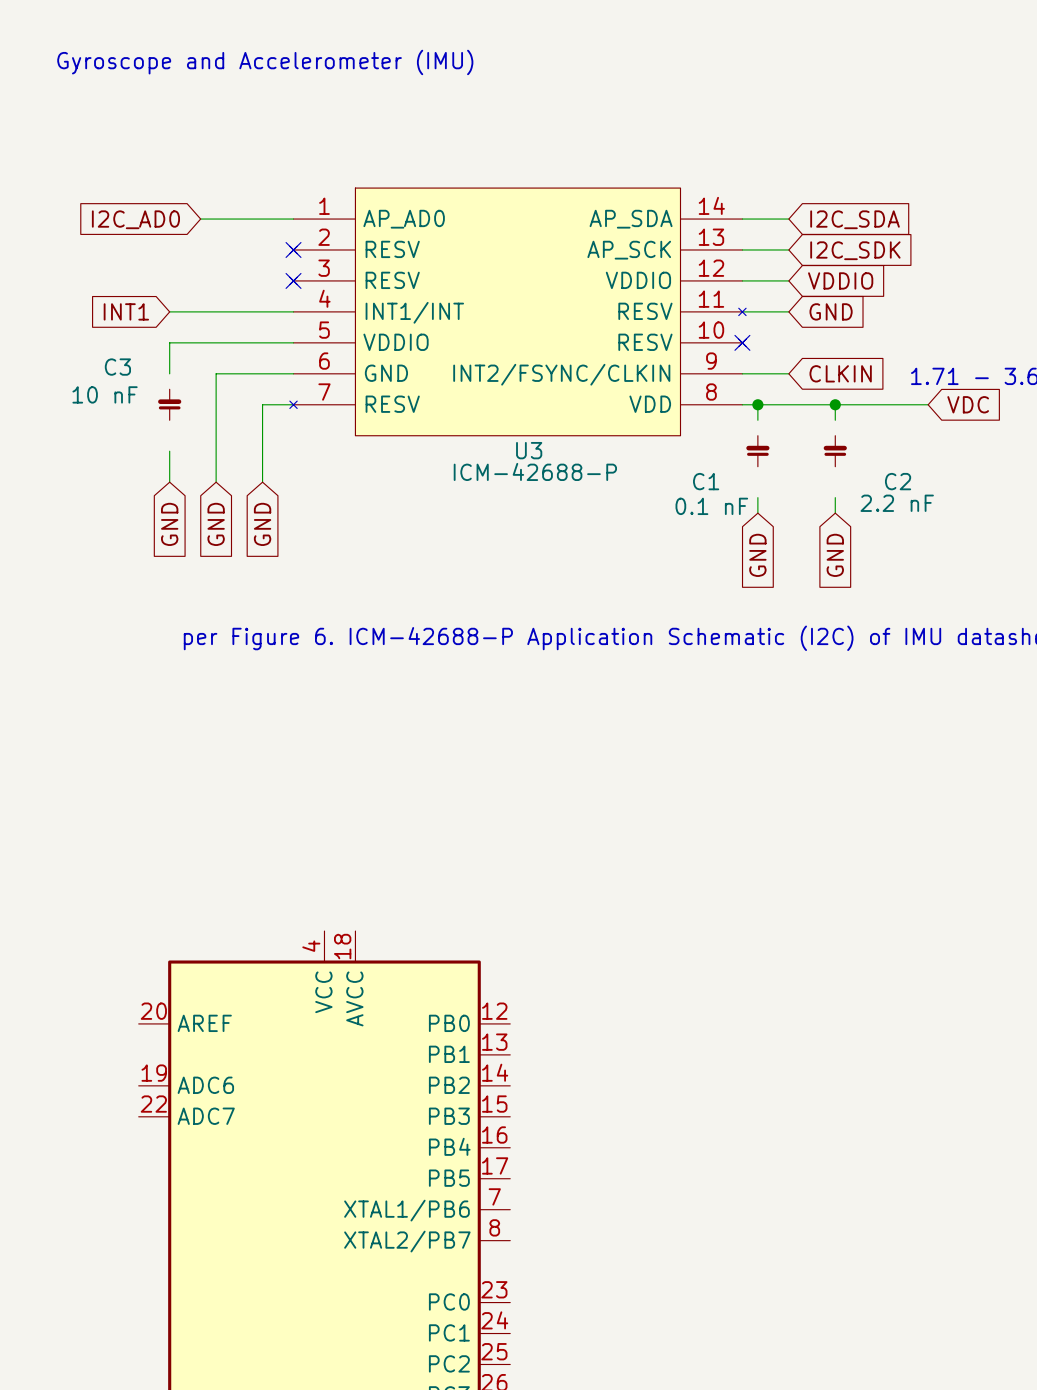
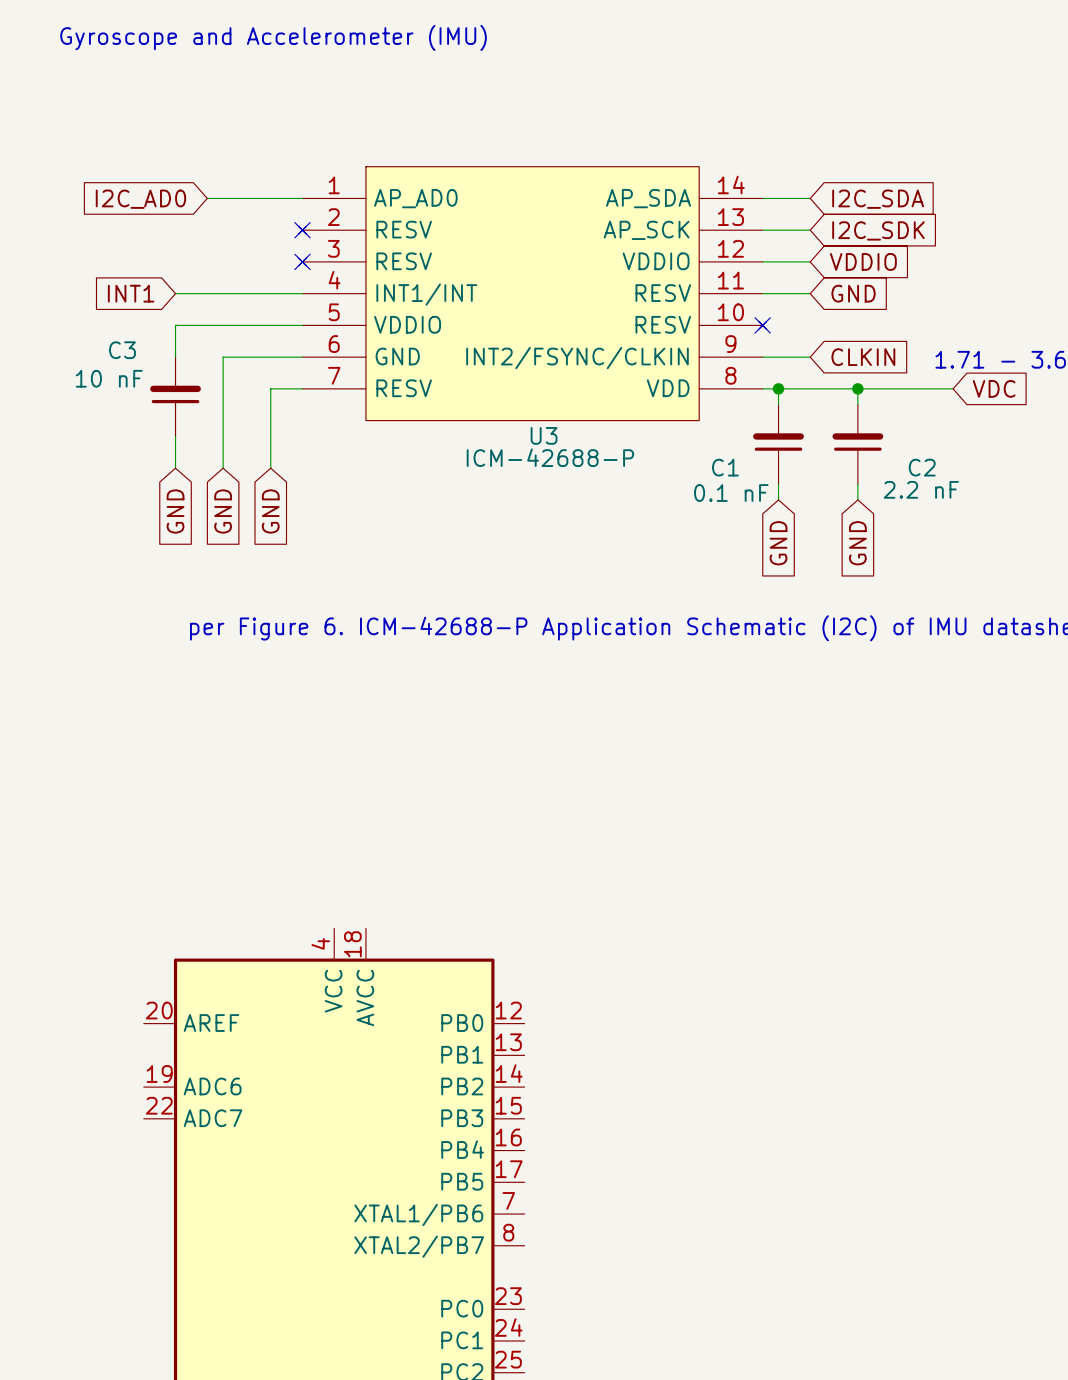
U3 symbol: [289, 188, 747, 436] -> [298, 166, 767, 421]
C3 symbol: [158, 389, 182, 421] -> [150, 357, 201, 437]
C1 symbol: [746, 435, 770, 467] -> [753, 404, 804, 485]
C2 symbol: [823, 435, 847, 467] -> [832, 404, 884, 485]

